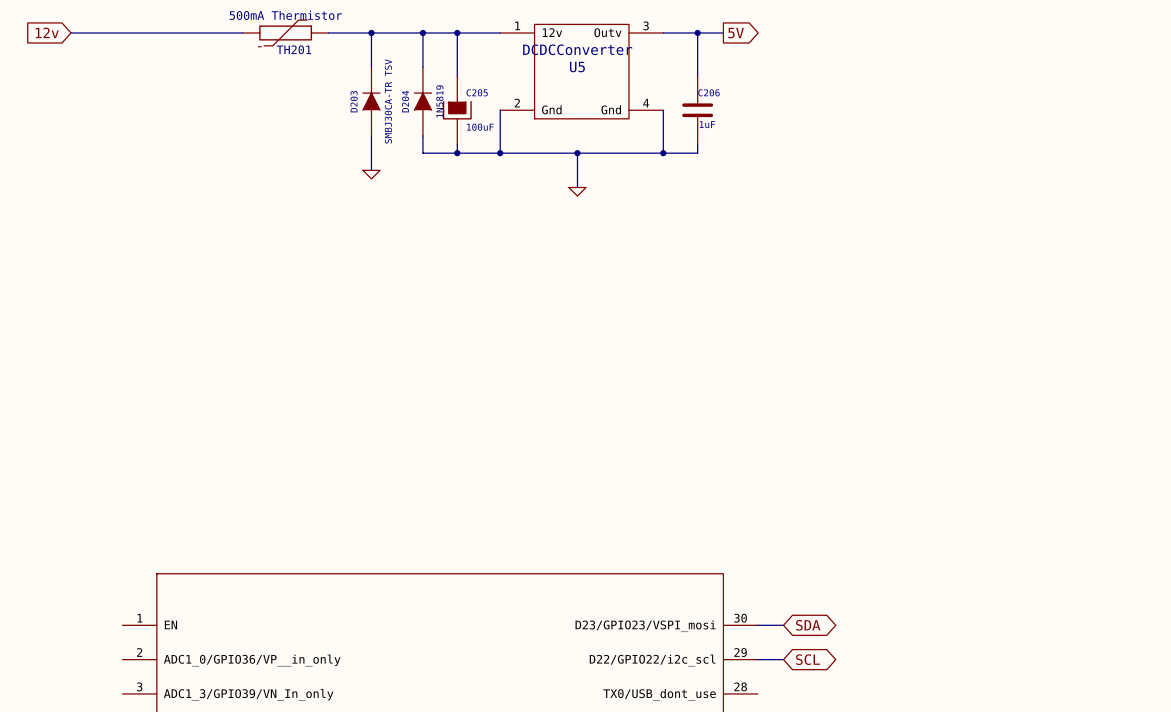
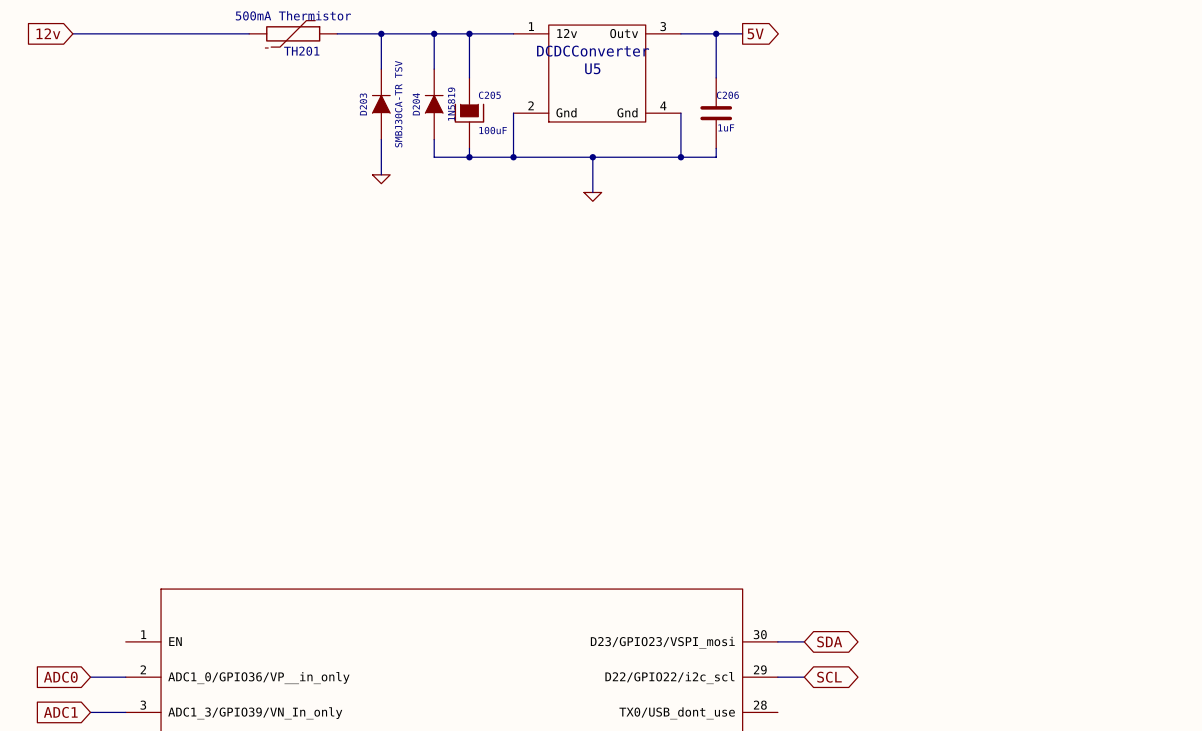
global label: none -> ADC0 (60, 677)
wire: none -> (90, 677) (125, 677)
global label: none -> ADC1 (60, 712)
wire: none -> (90, 712) (125, 712)

